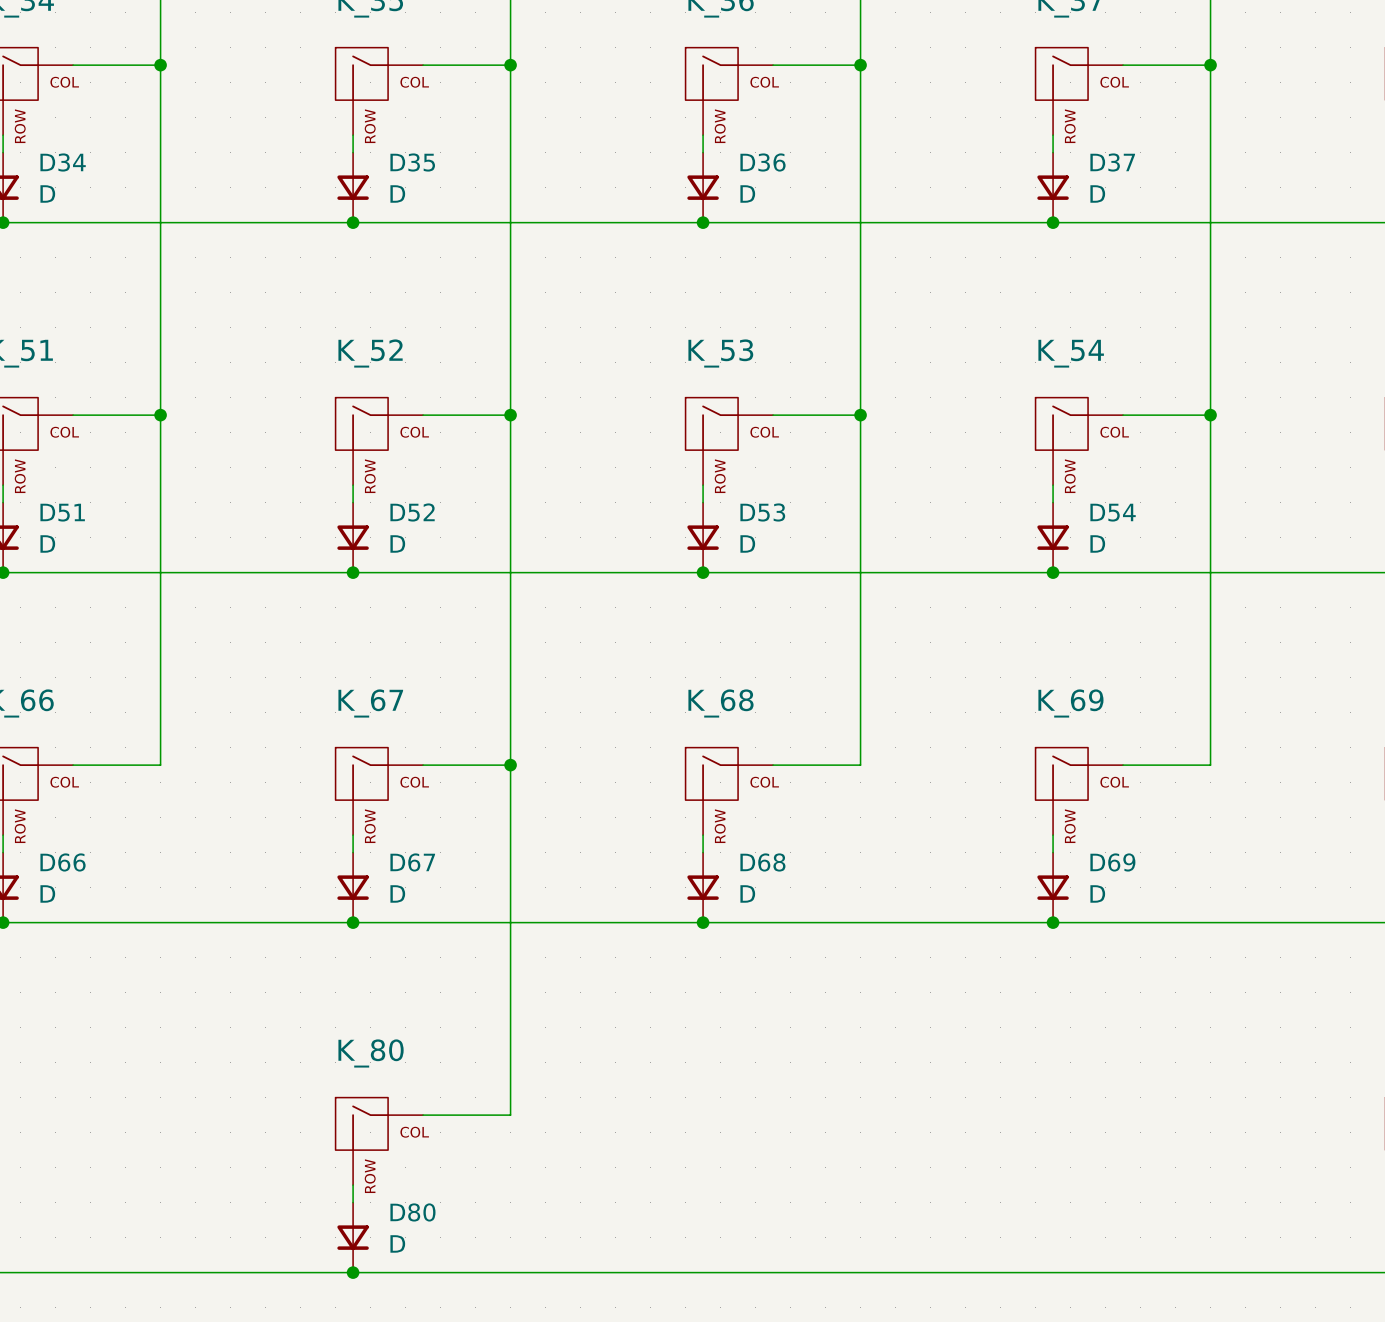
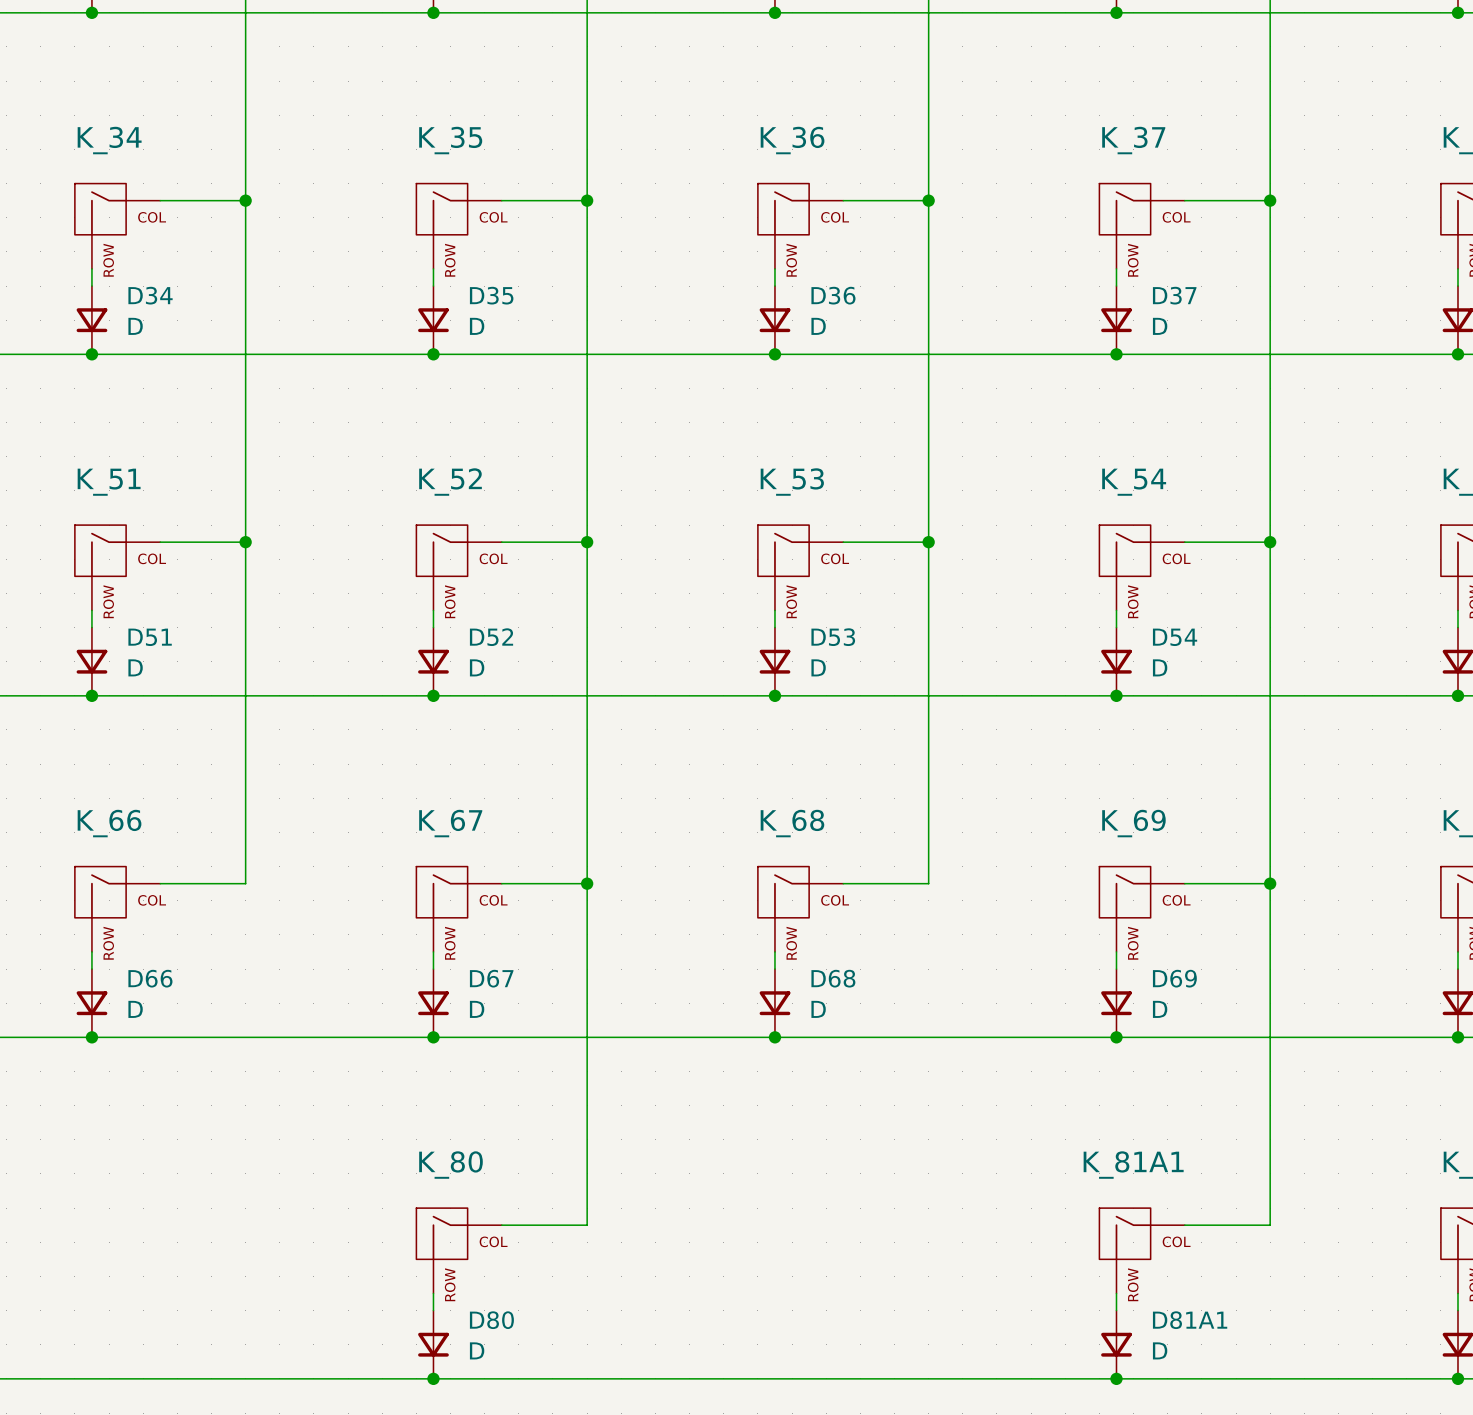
wire: none -> (1270, 883) (1270, 1225) (1184, 1225)
junction: none -> (1270, 883)
K_81A1: none -> (1142, 1250)
wire: none -> (1116, 1293) (1116, 1310)
D81A1: none -> D (1116, 1344)
junction: none -> (1116, 1378)

